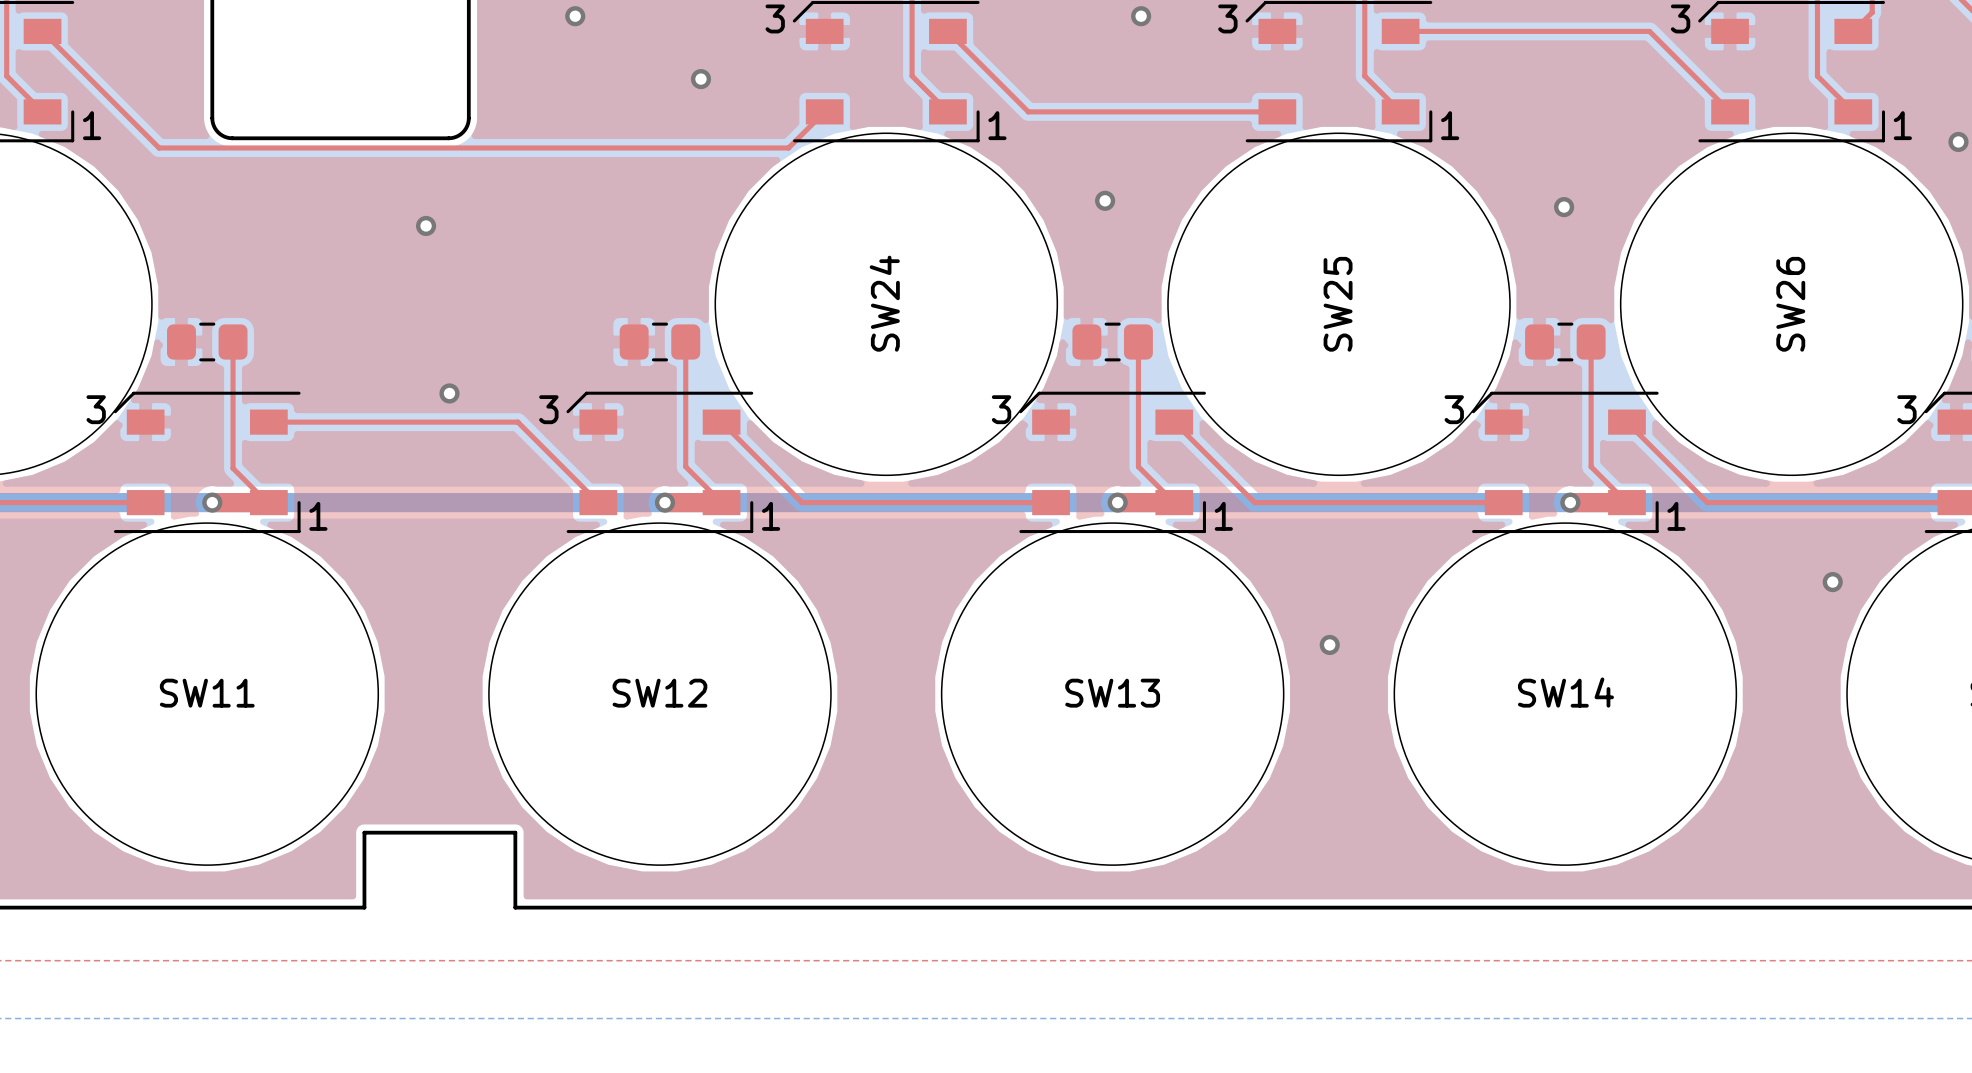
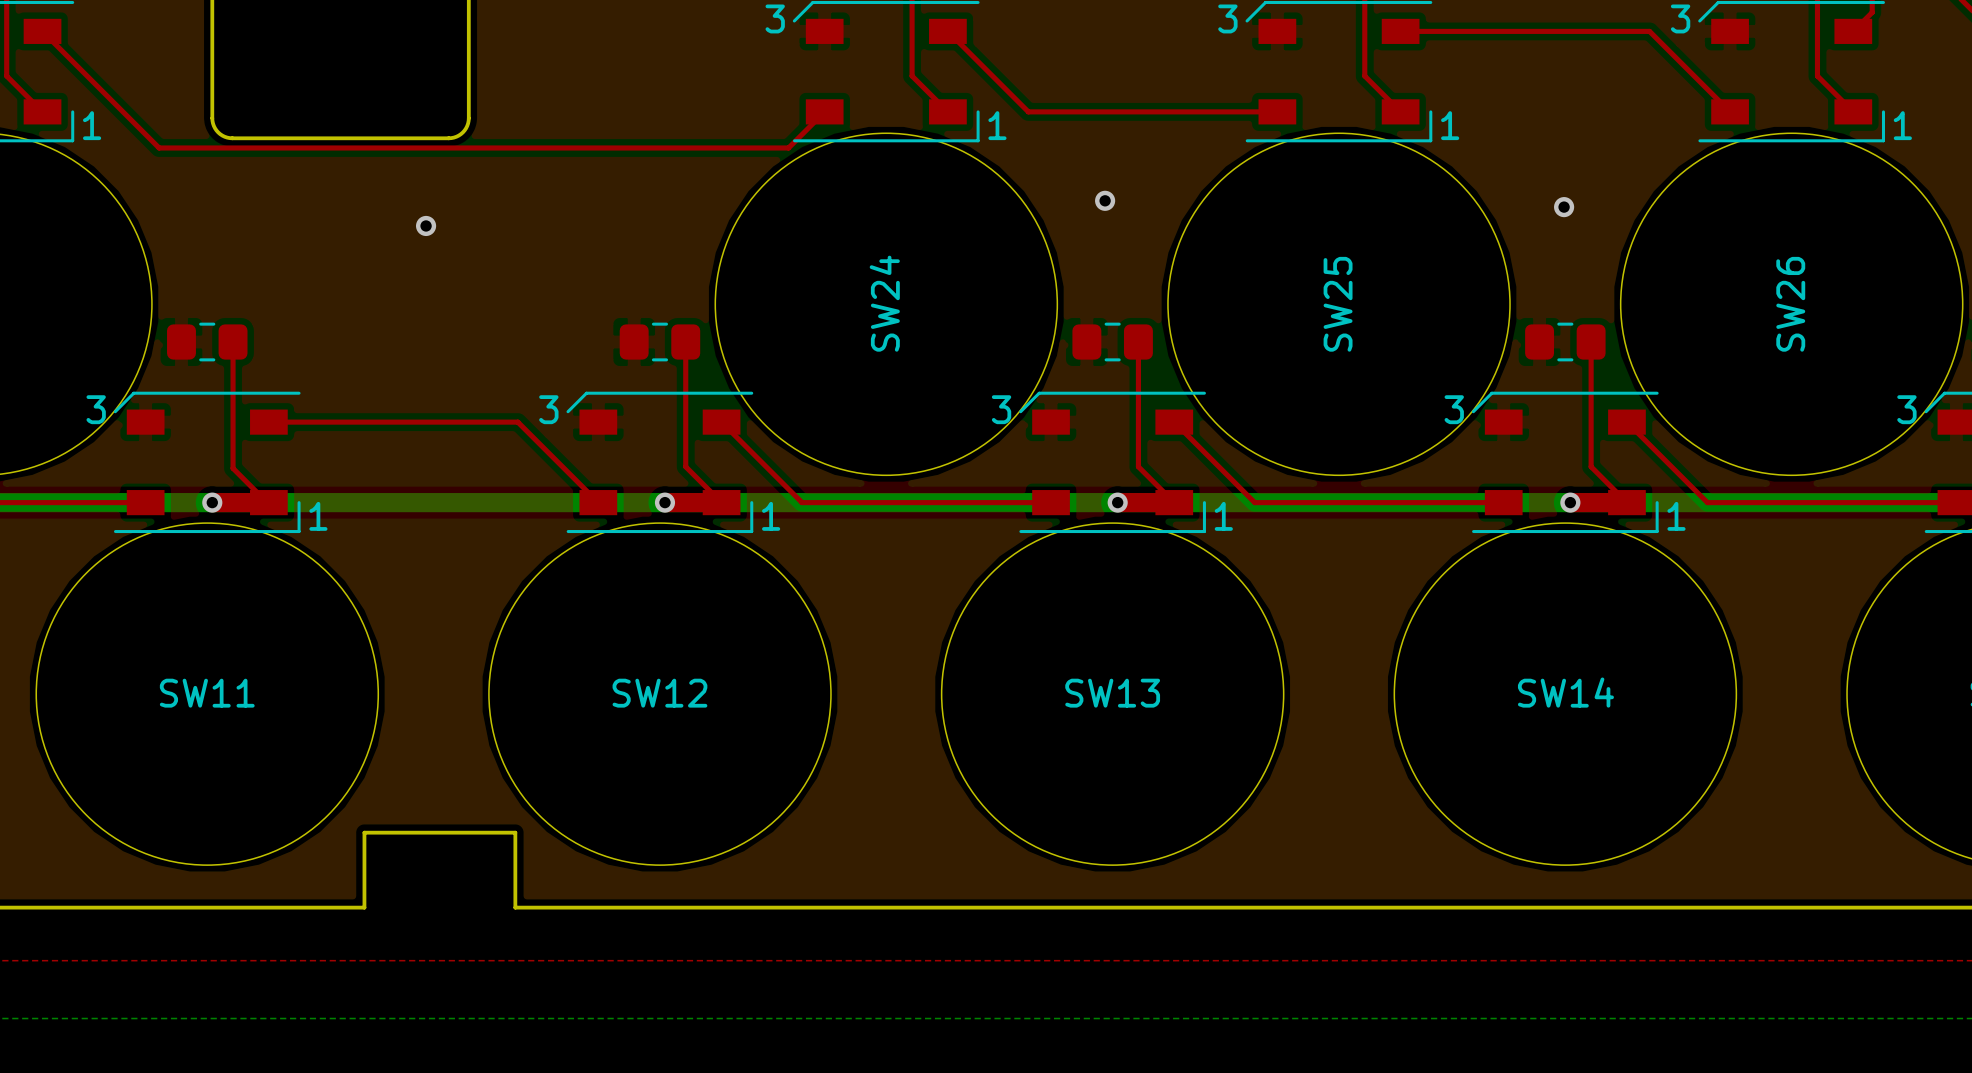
via: (575, 16) -> none
via: (1141, 16) -> none
via: (700, 79) -> none
via: (1958, 141) -> none
via: (449, 393) -> none
via: (1832, 582) -> none
via: (1329, 644) -> none

